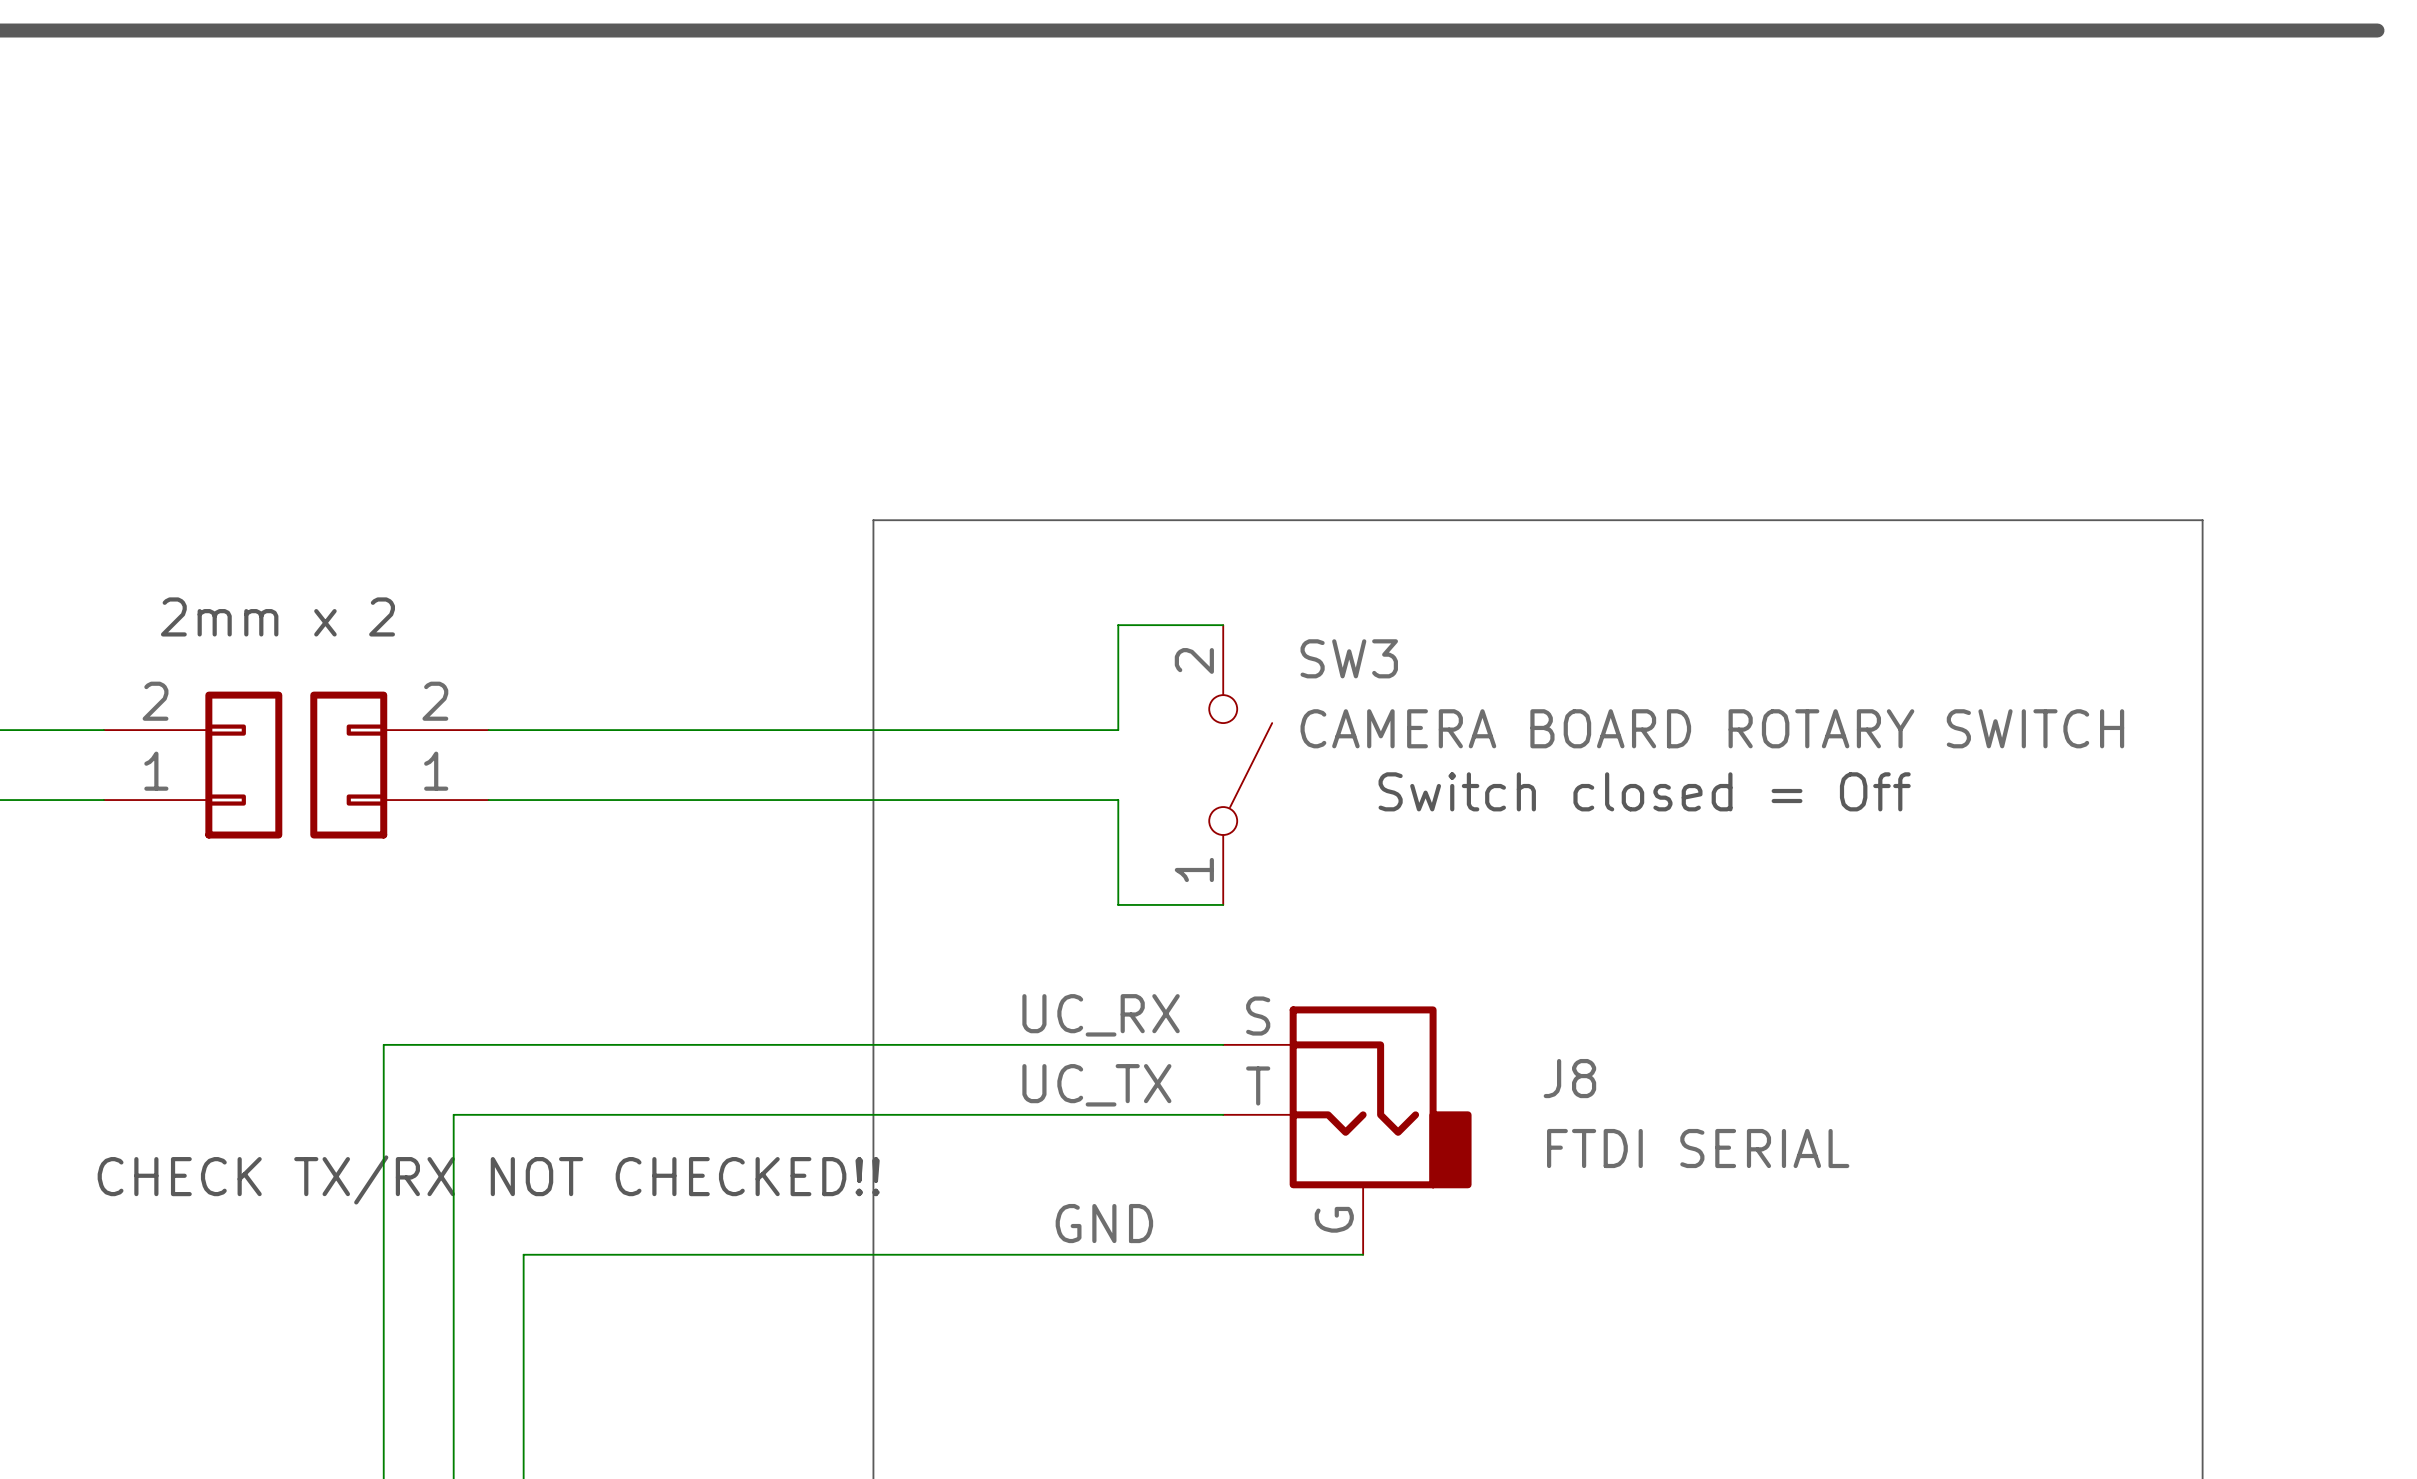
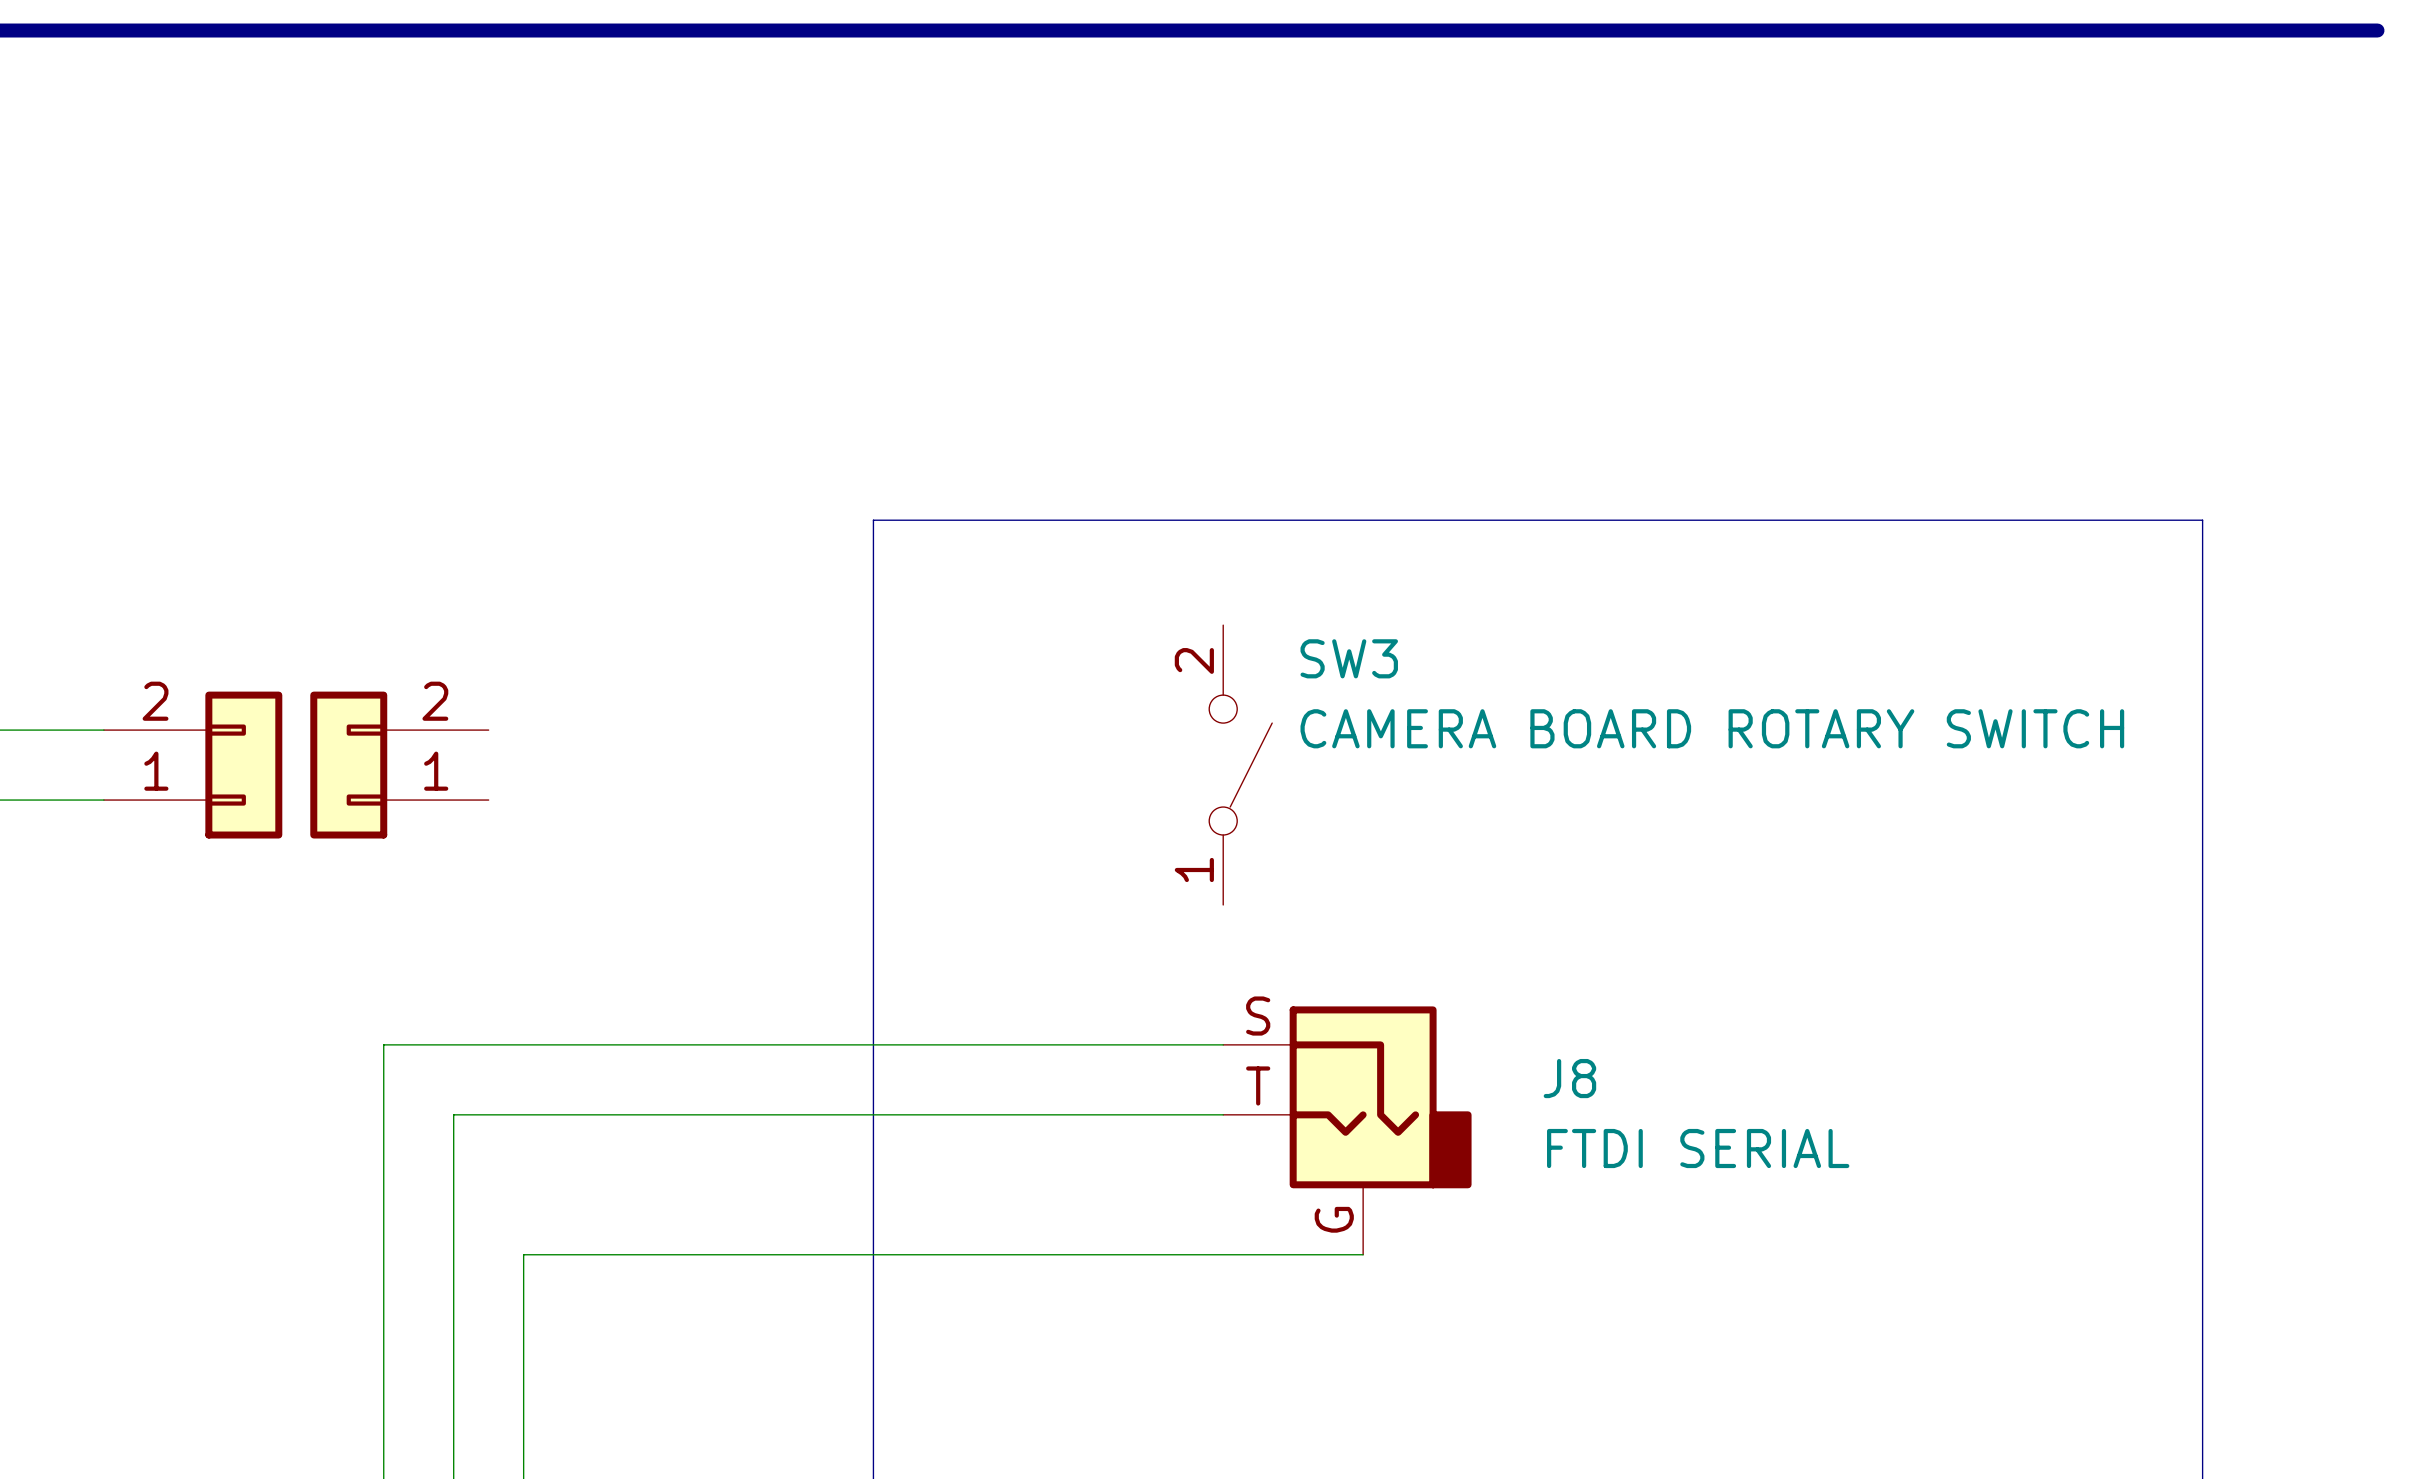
text: 2mm x 2 (277, 616) -> none
wire: (1223, 625) (1118, 625) (1118, 730) (488, 730) -> none
text: Switch closed = Off (1644, 791) -> none
wire: (488, 800) (1118, 800) (1118, 904) (1223, 904) -> none
label: UC_RX (1101, 1015) -> none
label: UC_TX (1096, 1085) -> none
text: CHECK TX/RX NOT CHECKED!! (488, 1179) -> none
label: GND (1104, 1223) -> none

